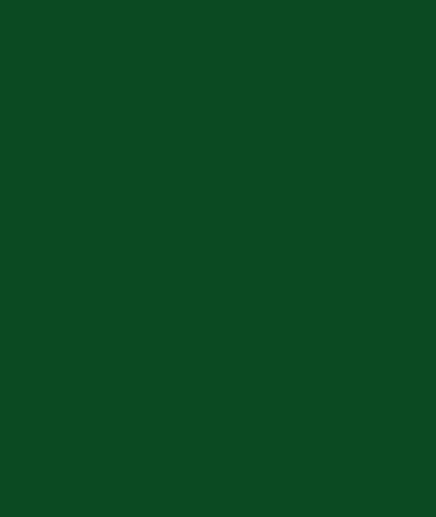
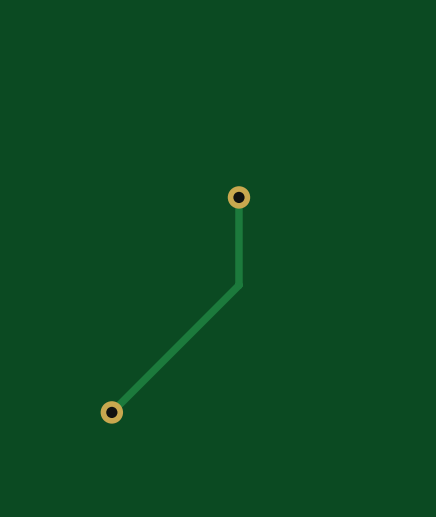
track: none -> (238, 197) (238, 285) (111, 412)
via: none -> (238, 197)
via: none -> (111, 412)

